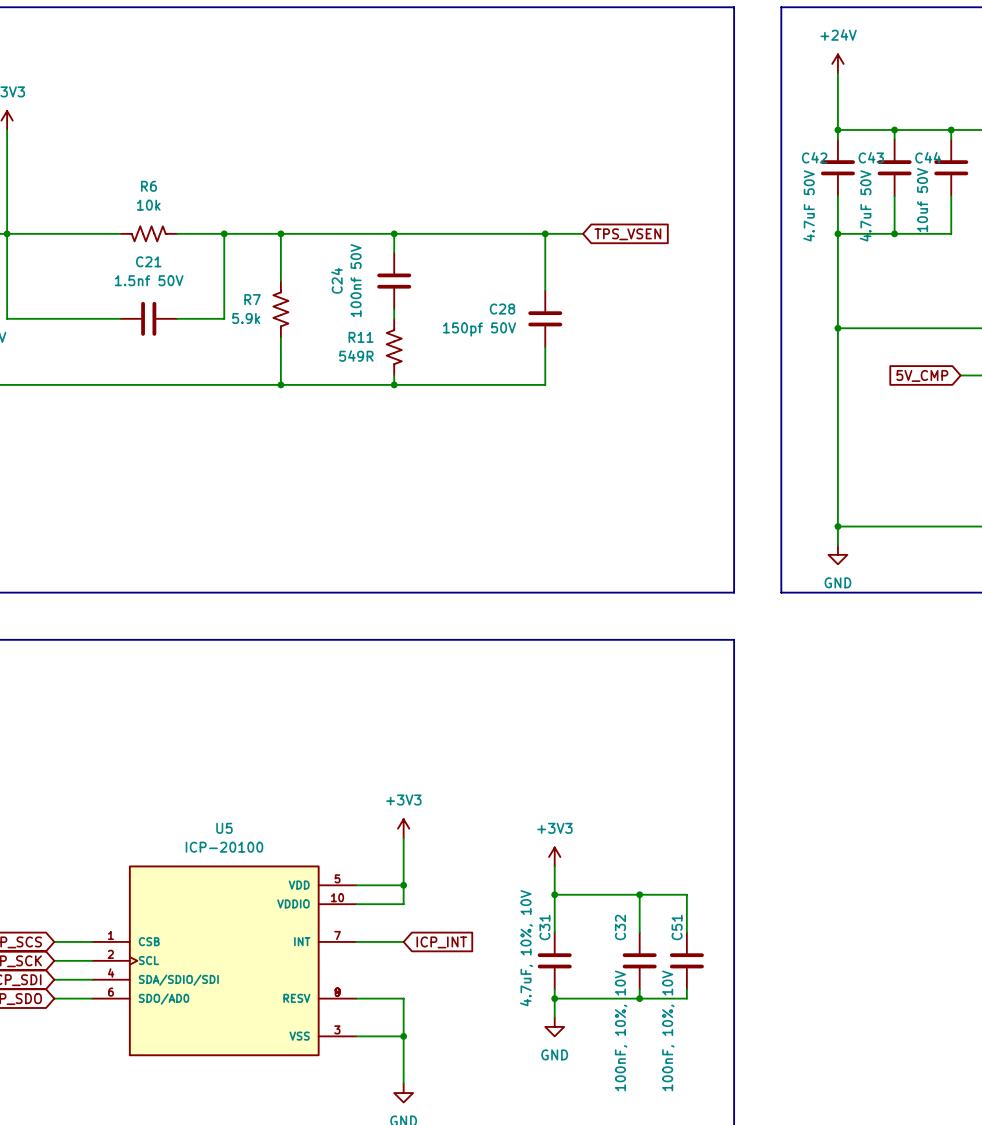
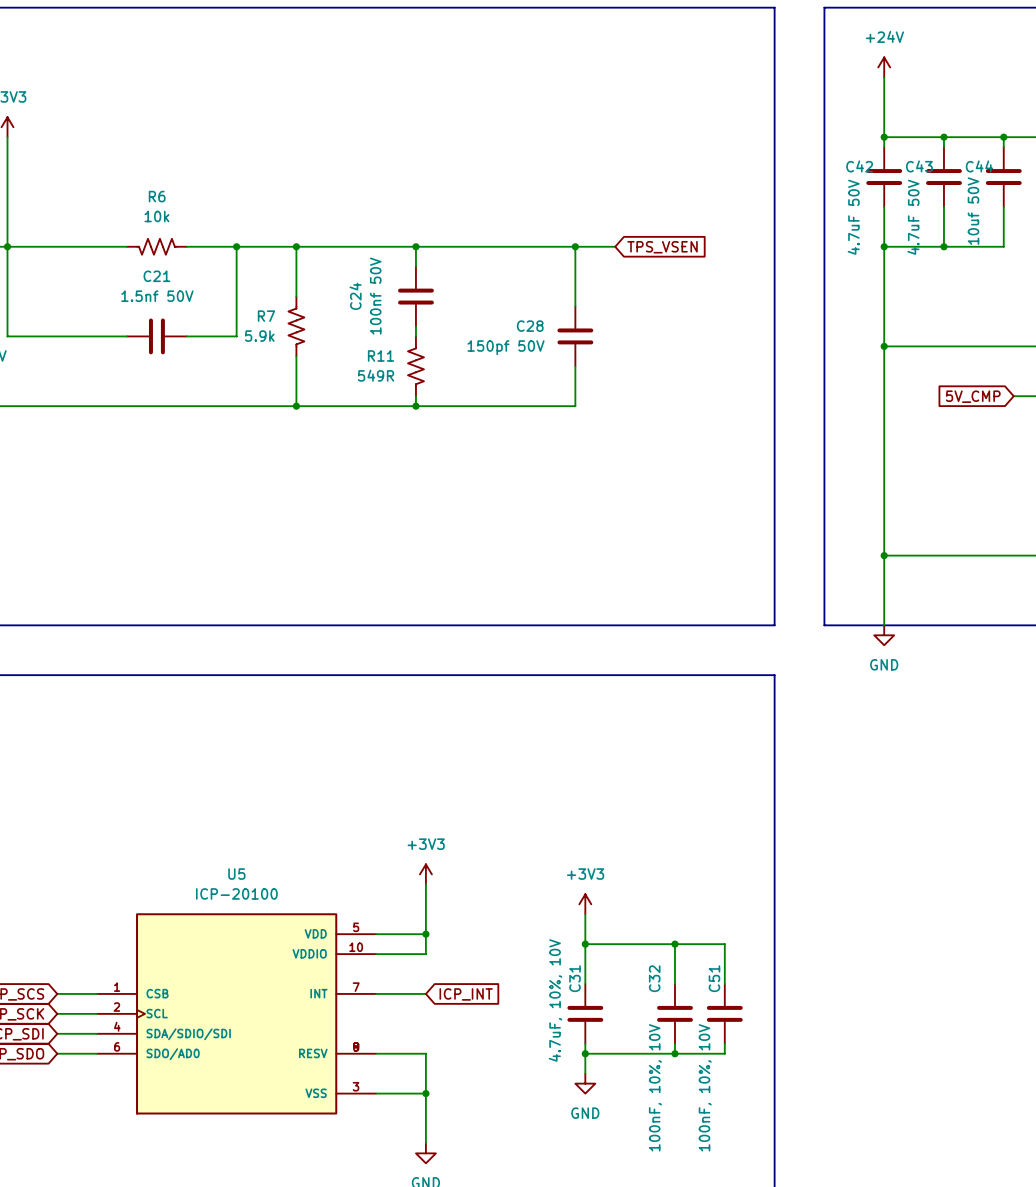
wire: none -> (884, 575) (884, 625)
power symbol position: GND (837, 554) -> GND (884, 635)

